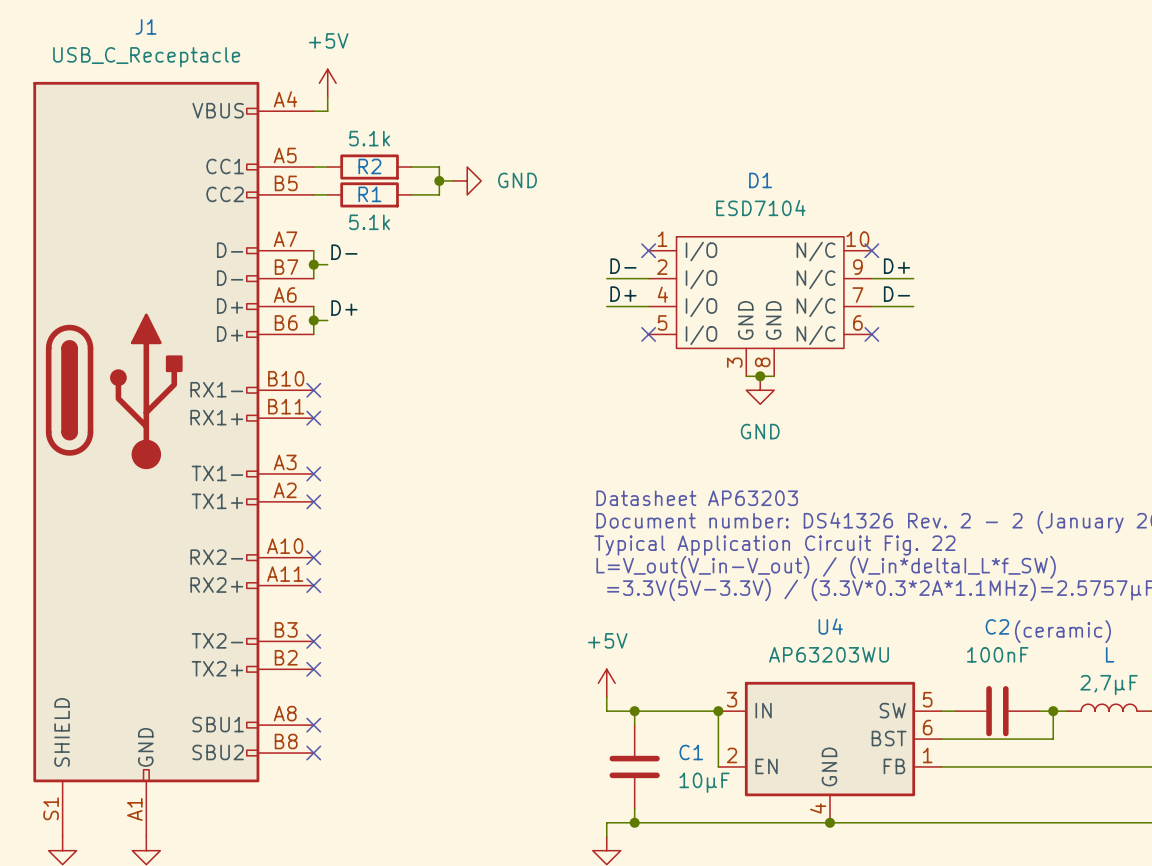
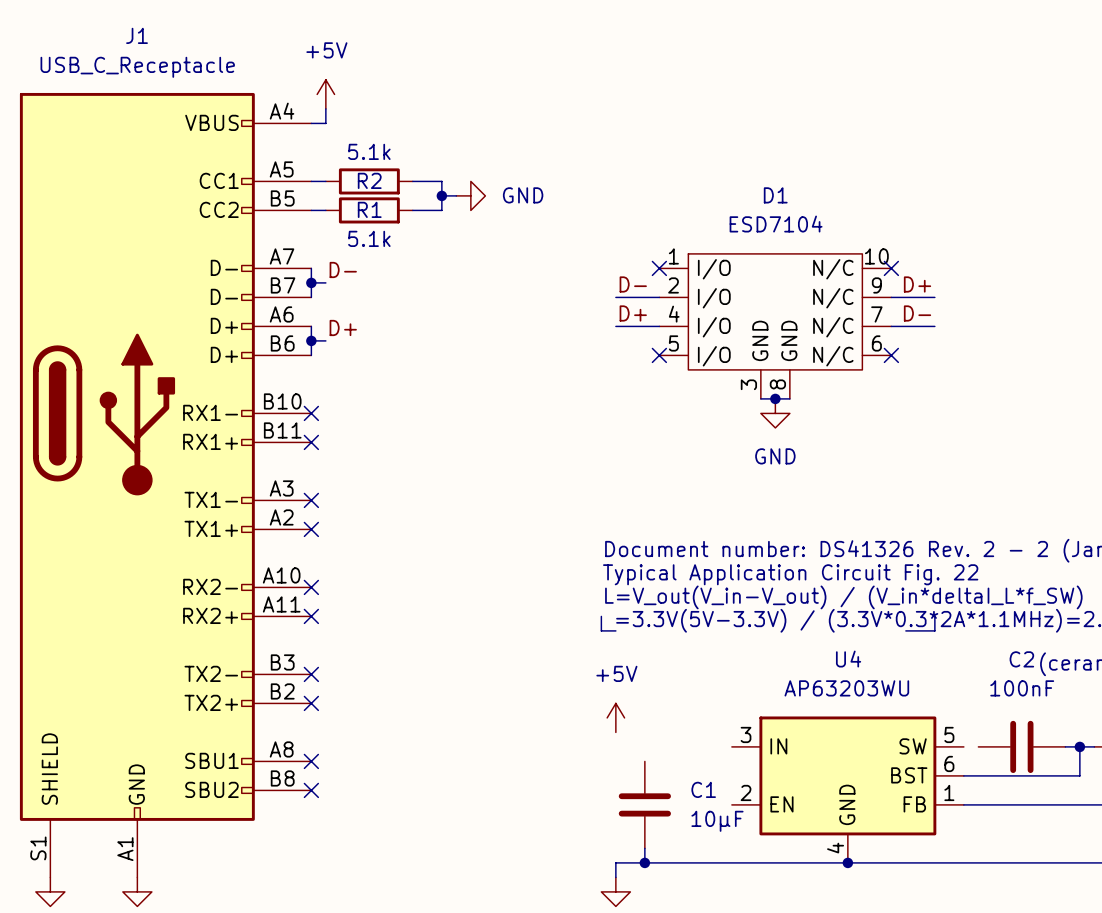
text: Datasheet AP63203 (697, 498) -> none
wire: none -> (601, 616) (601, 630) (615, 630)
wire: none -> (934, 616) (934, 630) (905, 630)
wire: (606, 697) (606, 711) (718, 711) (718, 766) -> none
wire: (634, 711) (634, 725) -> none
junction: (634, 711) -> none
junction: (718, 711) -> none
wire: (941, 711) (955, 711) -> none

